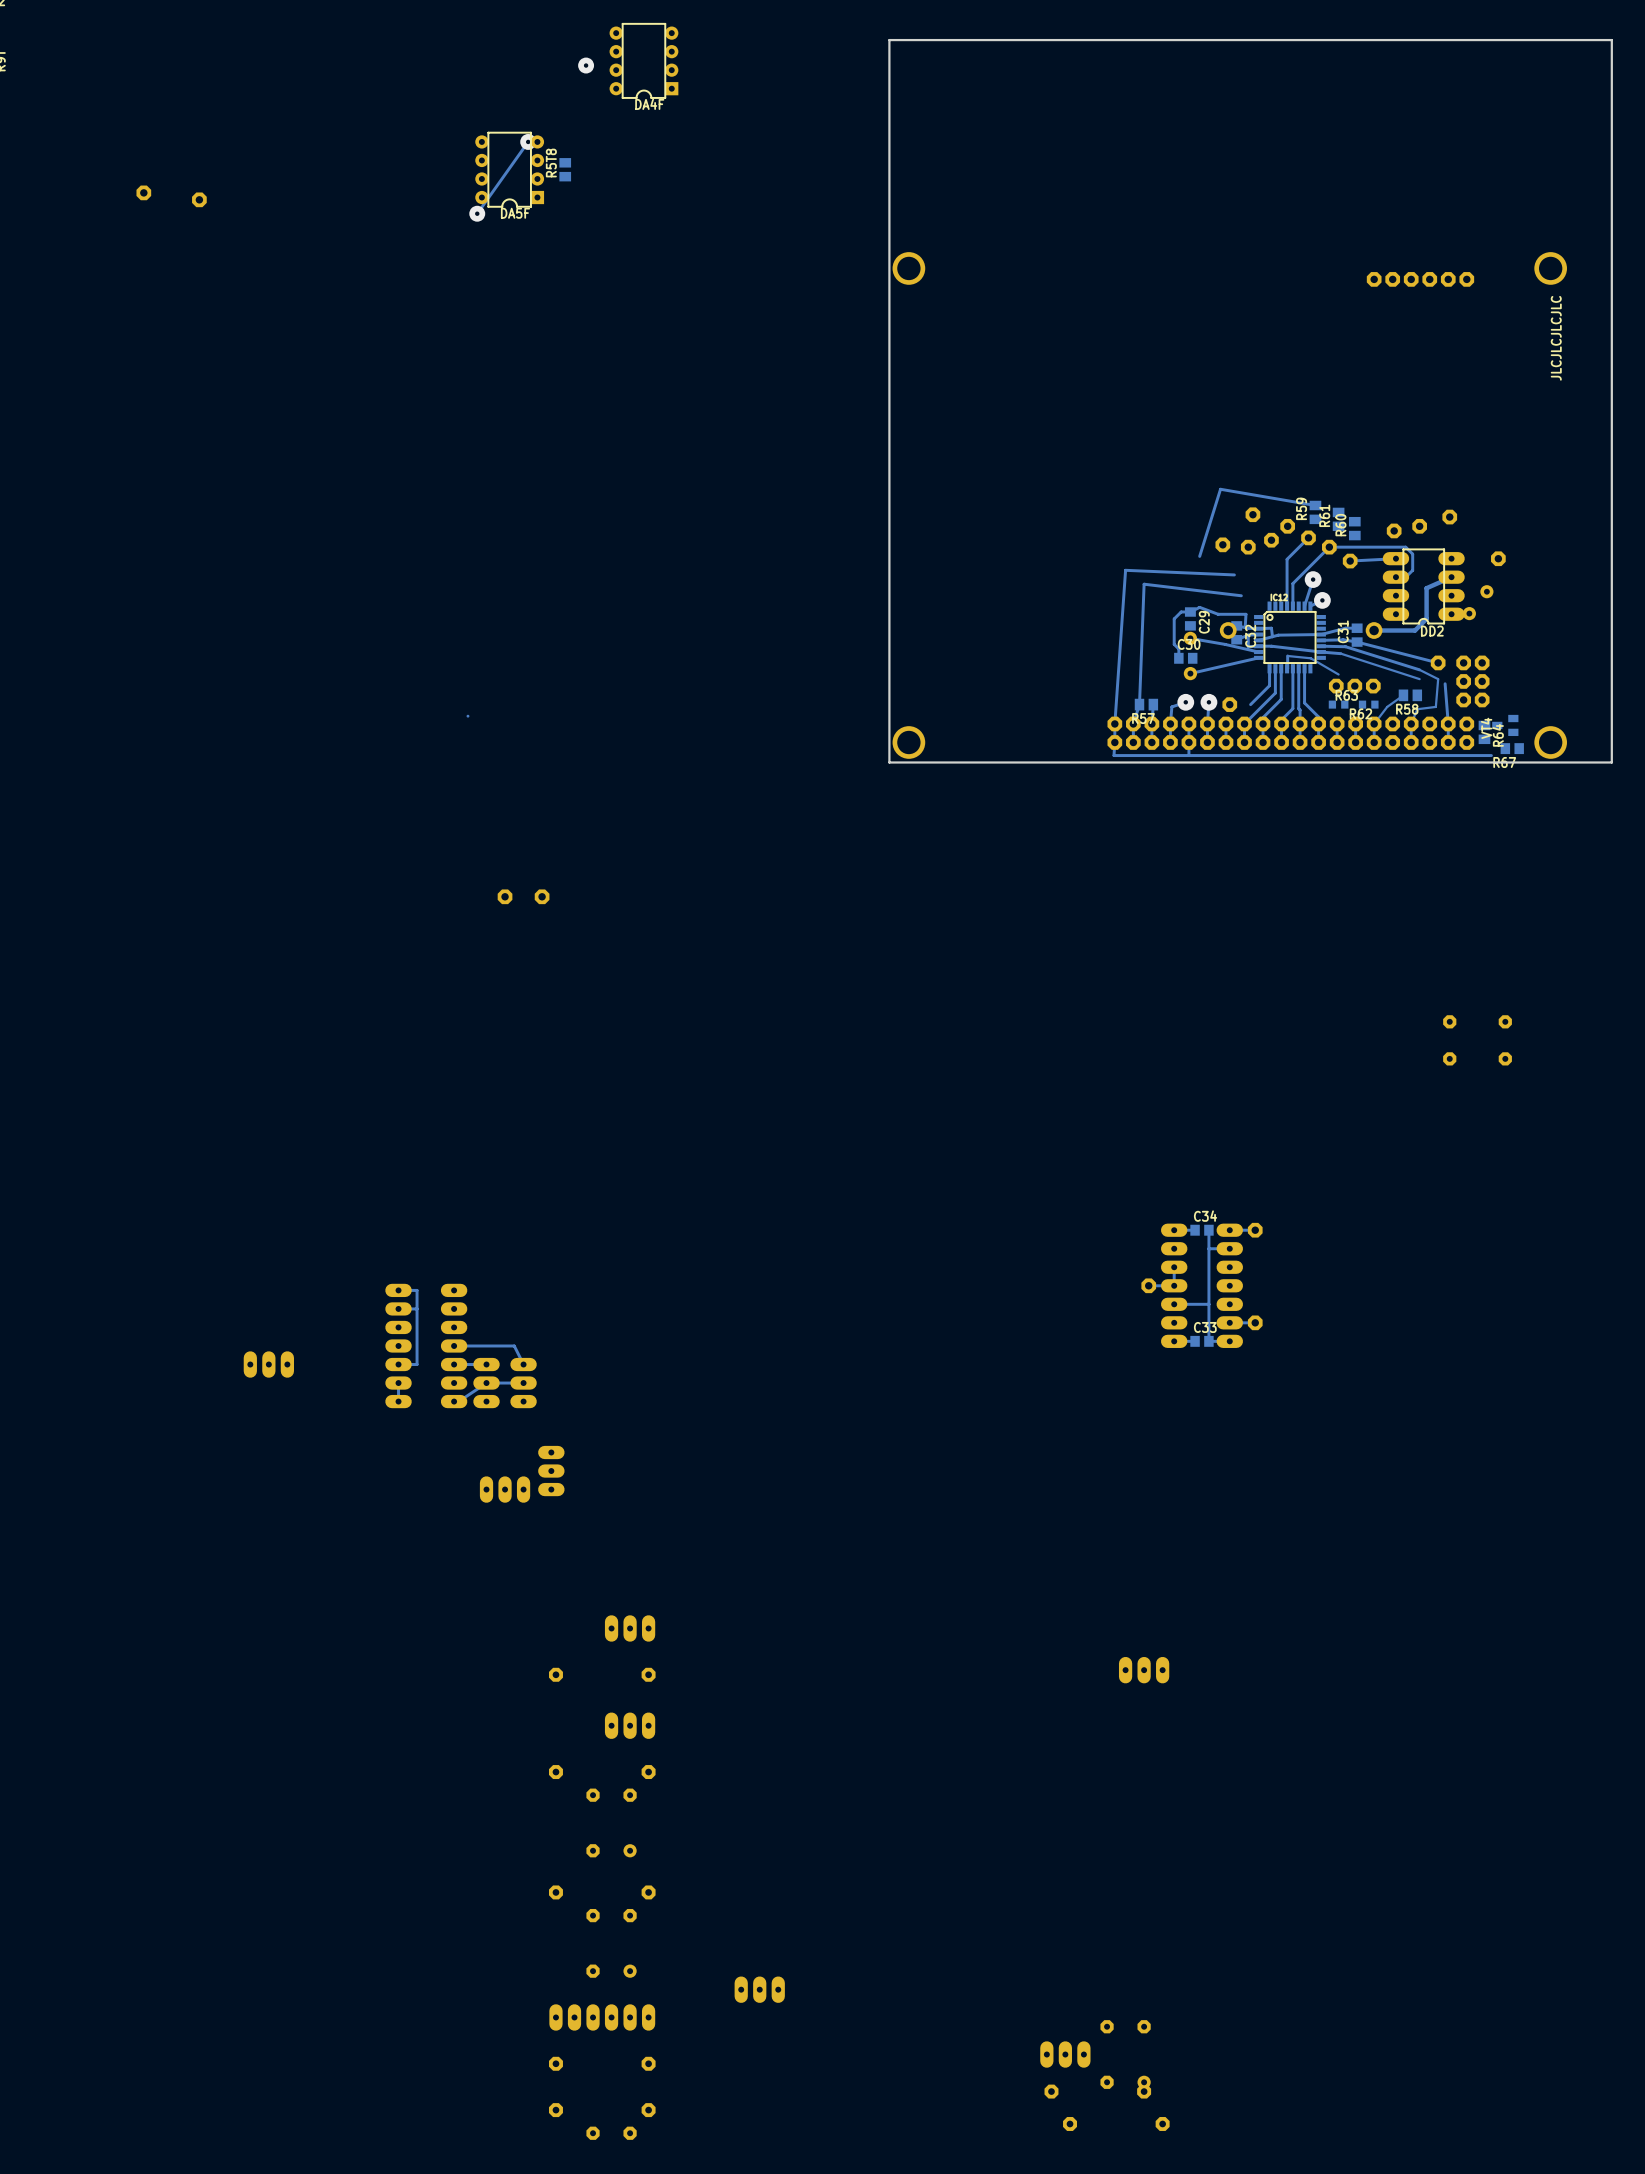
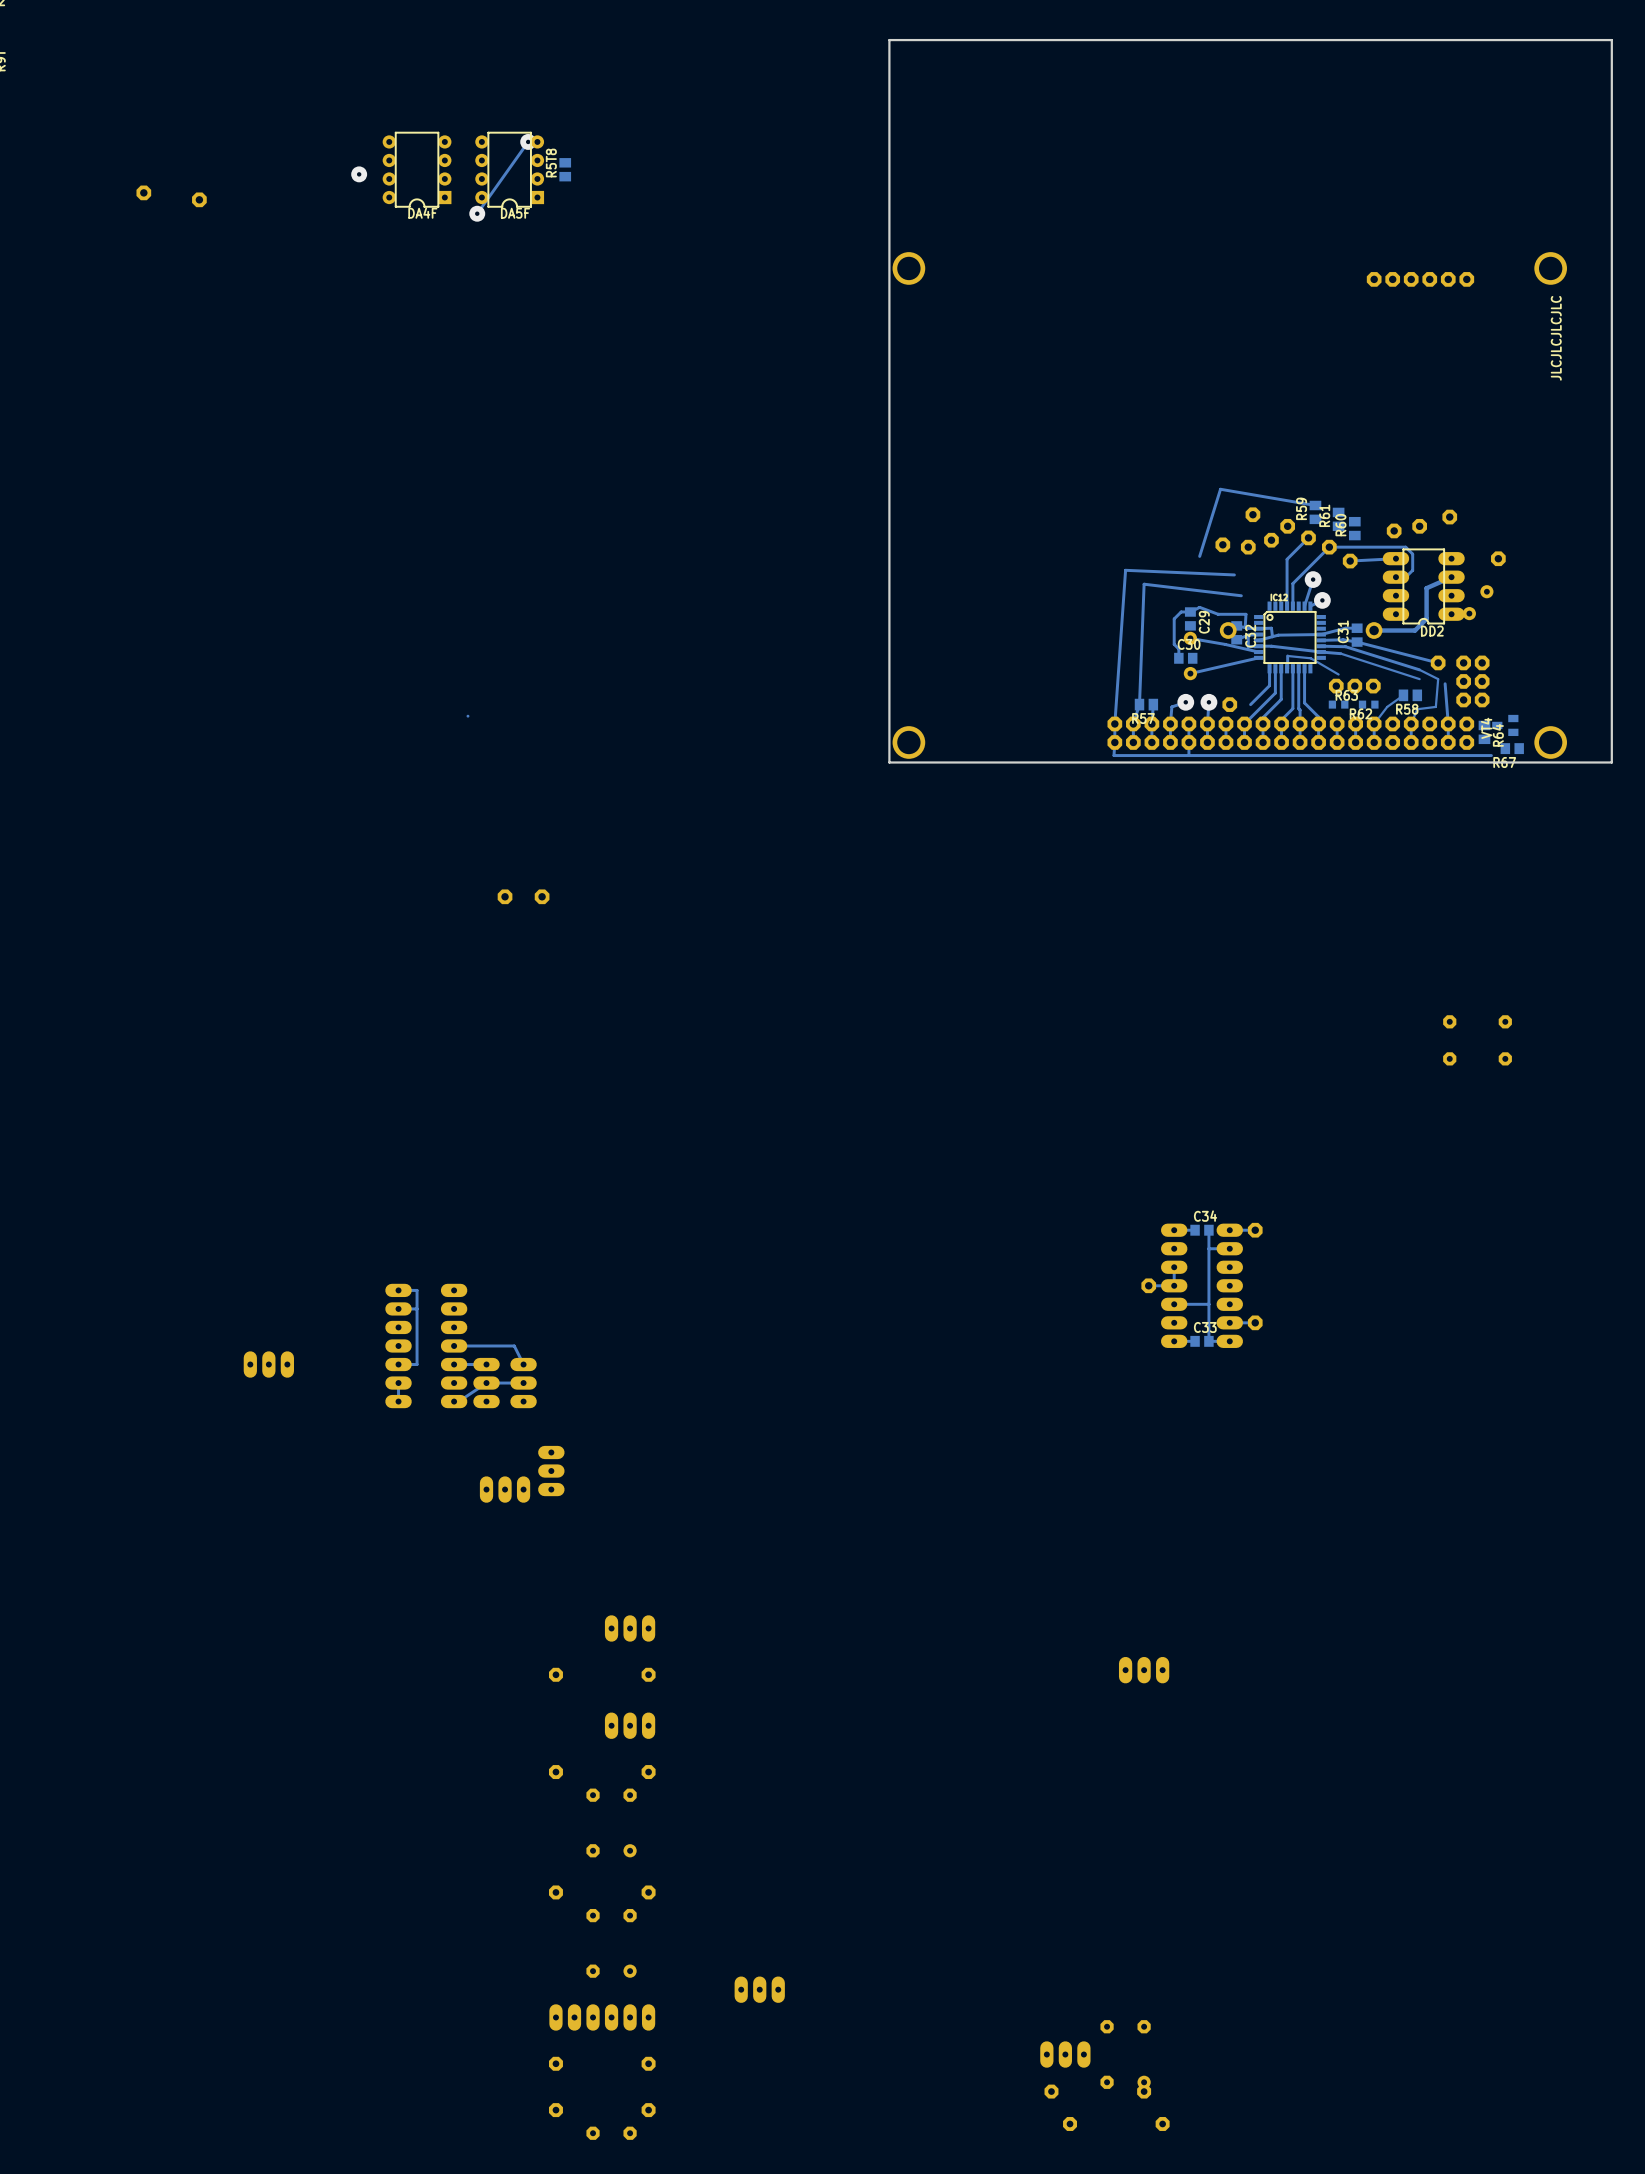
DA4F position: (643, 60) -> (417, 169)
via: (586, 65) -> none
via: none -> (359, 174)

